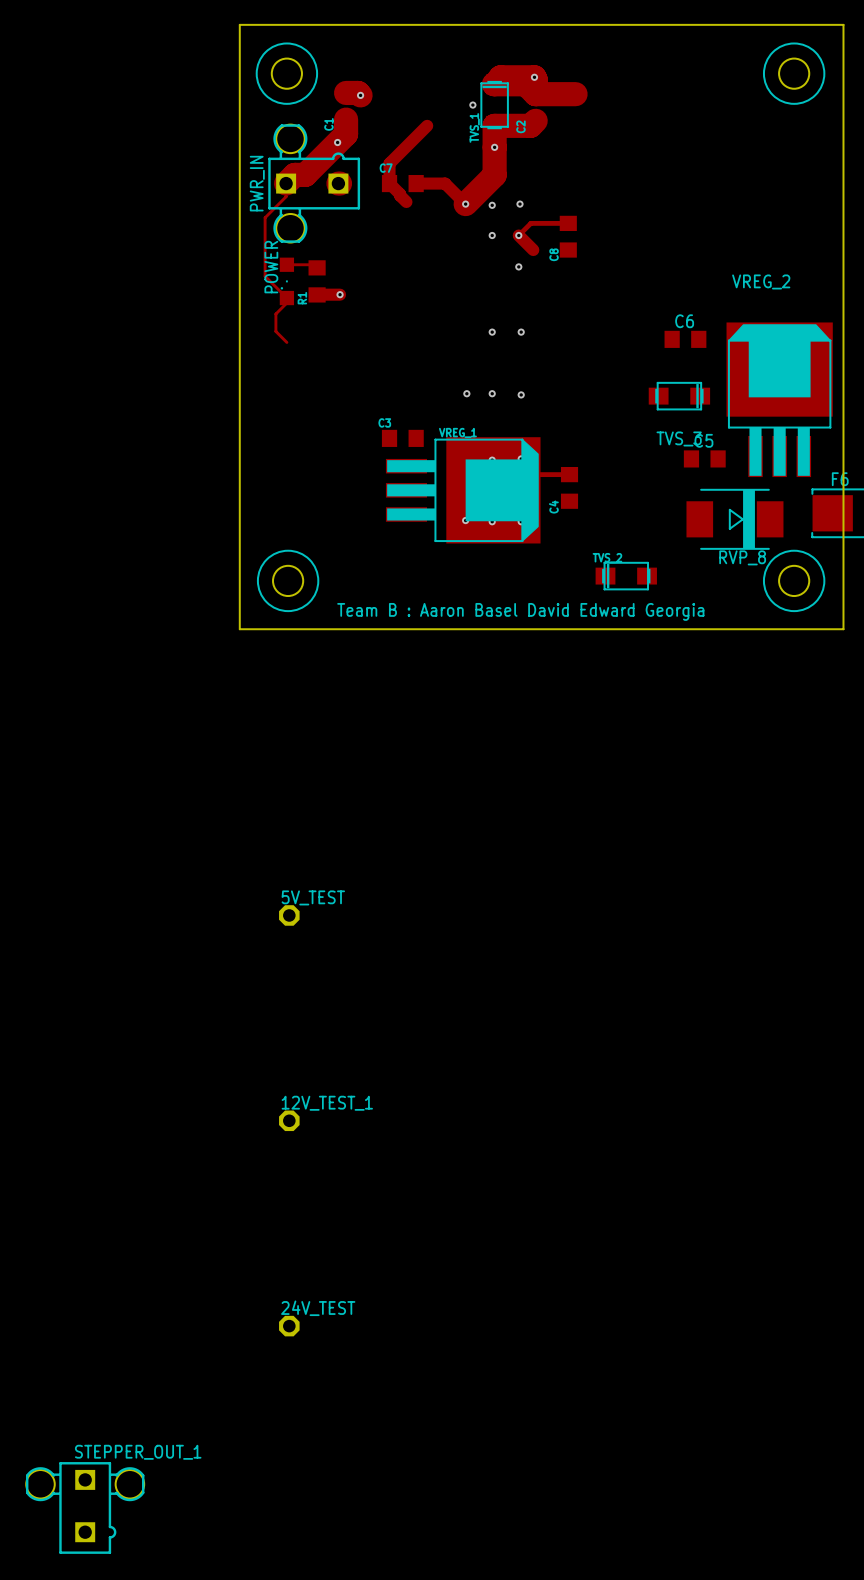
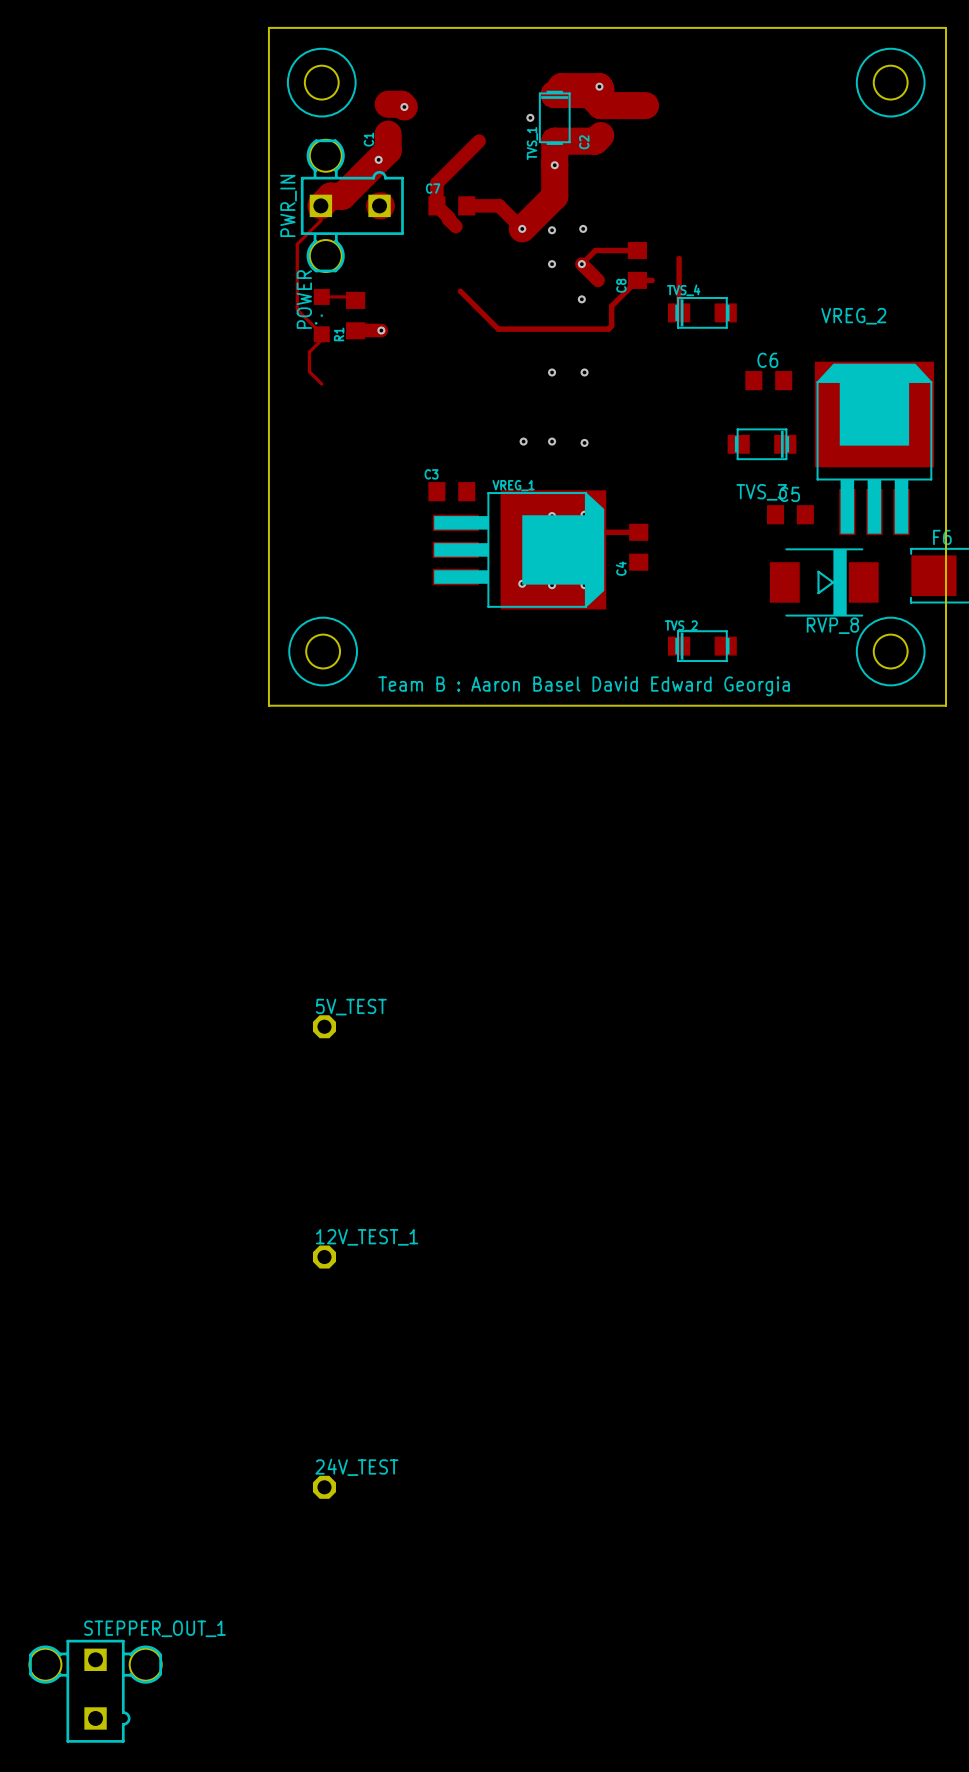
track: none -> (679, 258) (679, 312)
track: none -> (652, 280) (637, 280) (611, 306) (611, 325) (608, 329) (498, 329) (460, 291)
TVS_4: none -> (702, 312)

